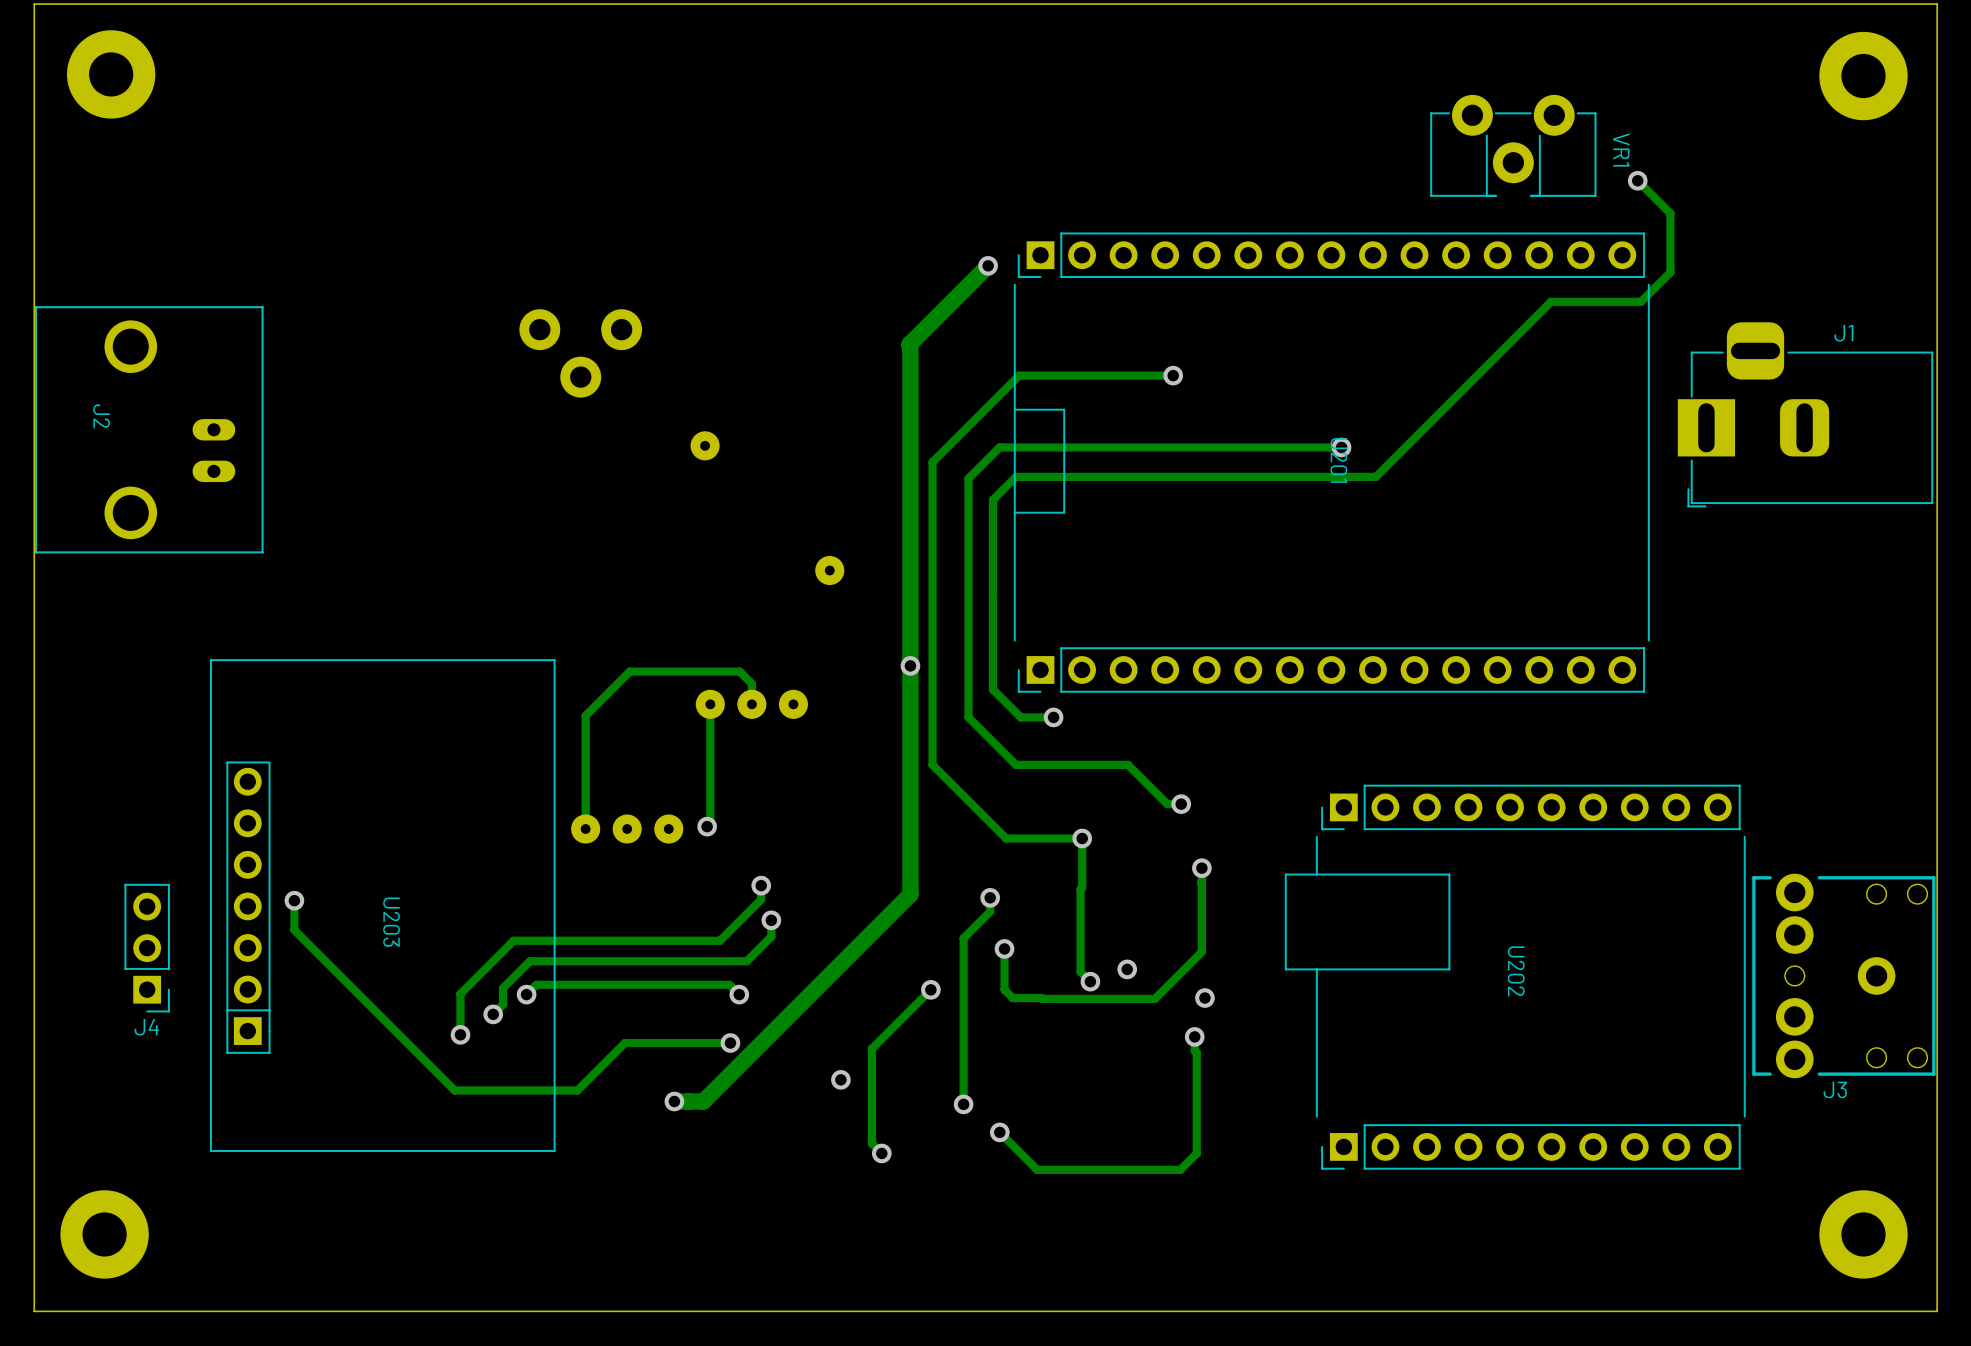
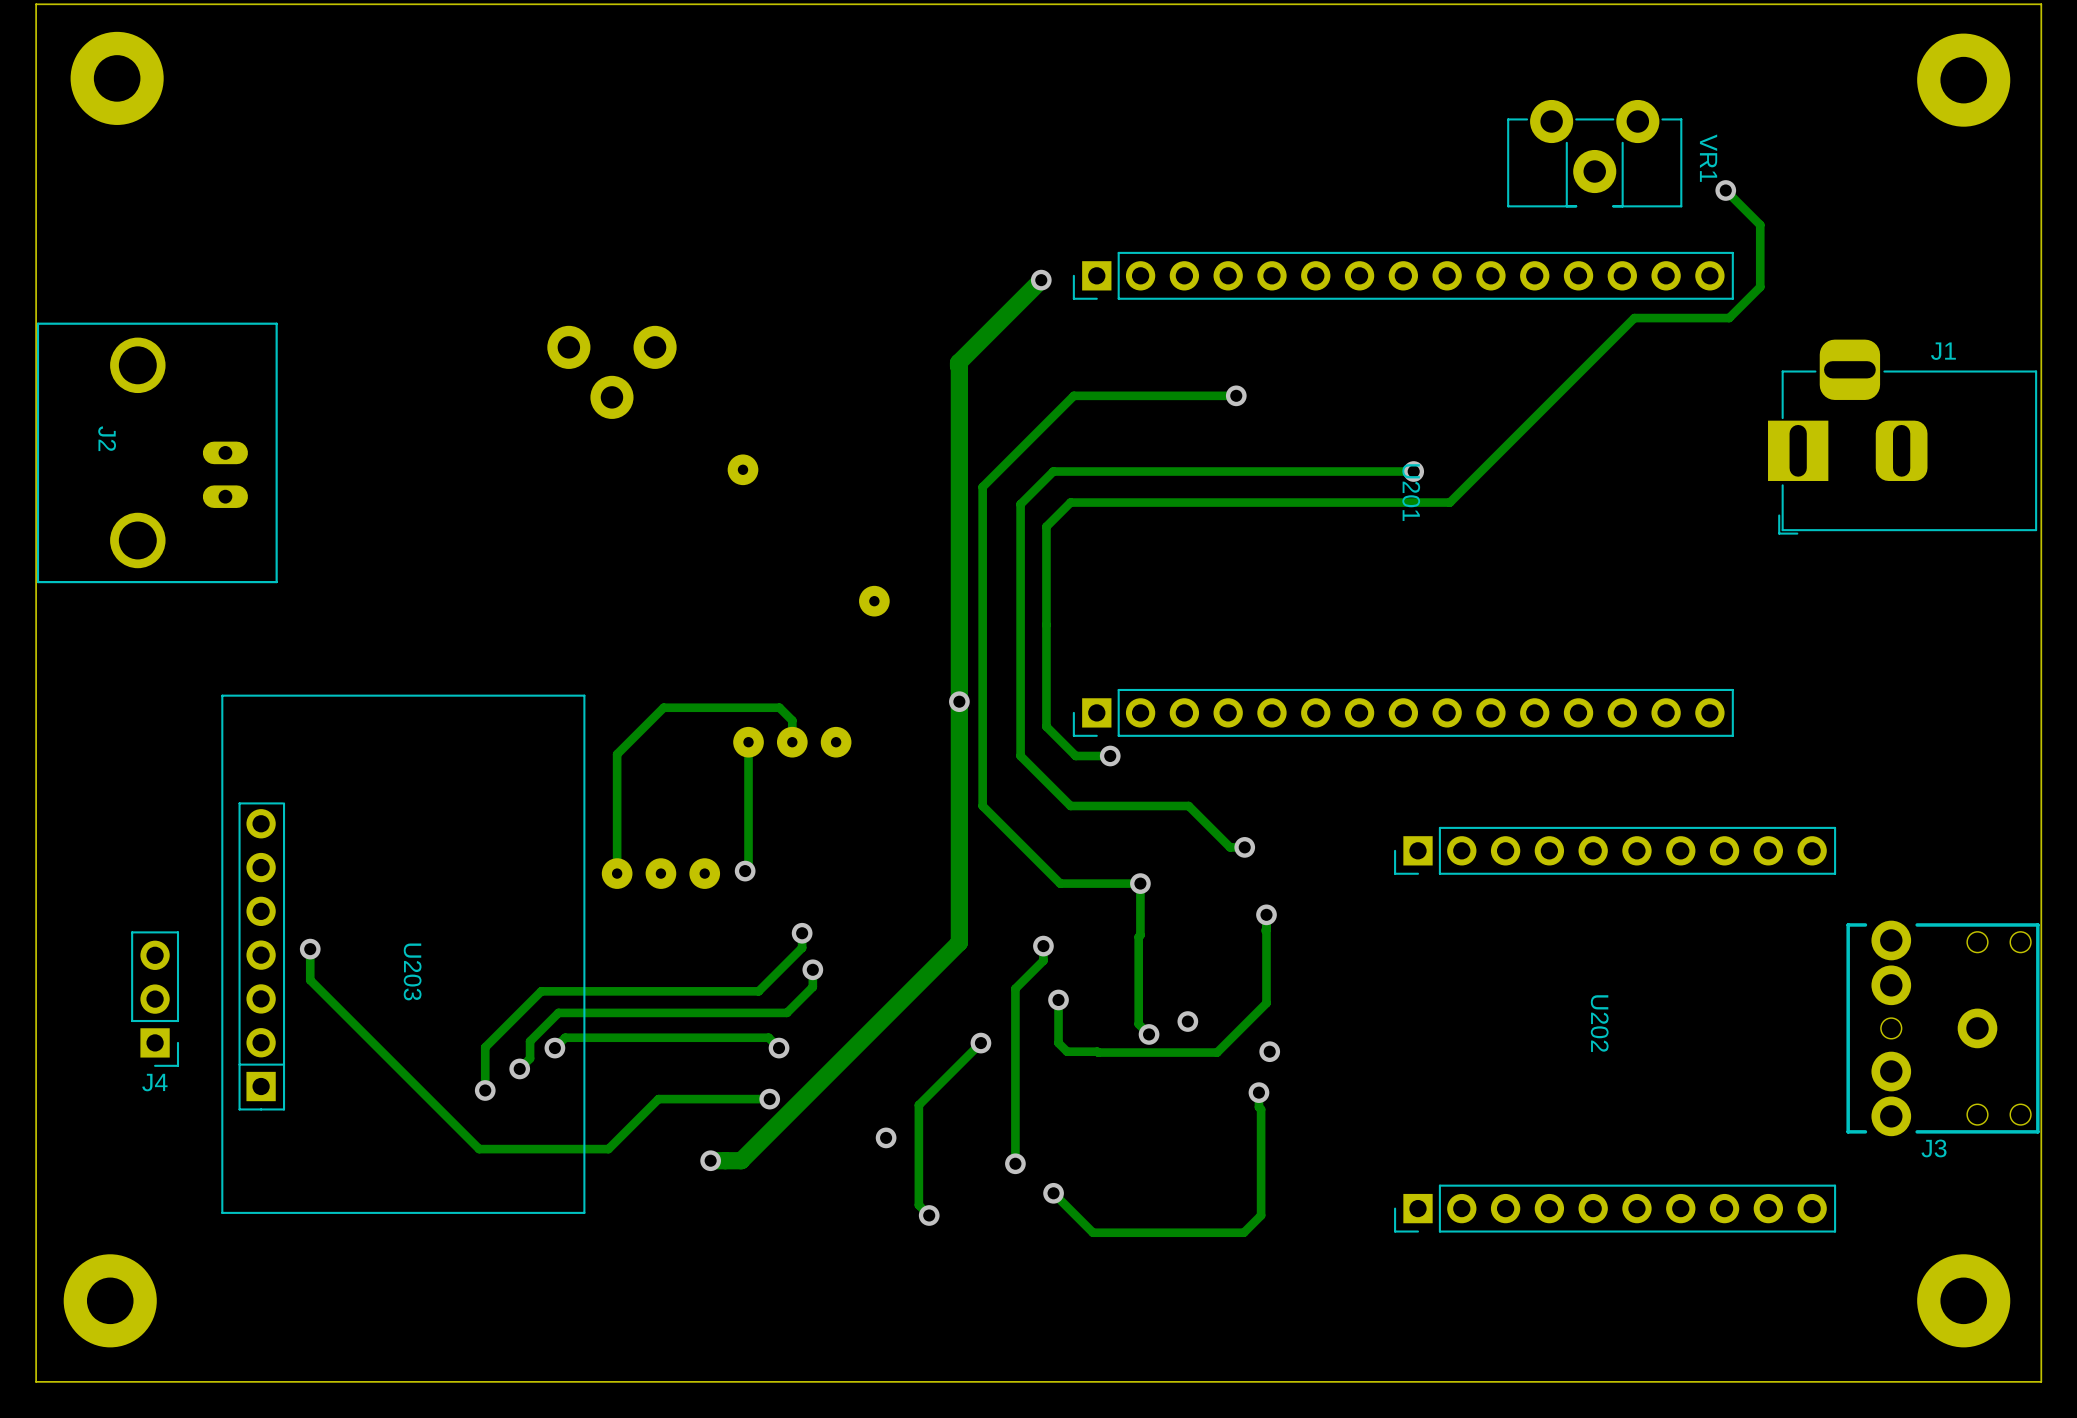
U201 footprint: [1013, 232, 1650, 693] -> [1072, 251, 1734, 737]
U202 footprint: [1284, 784, 1746, 1170] -> [1394, 826, 1837, 1233]

